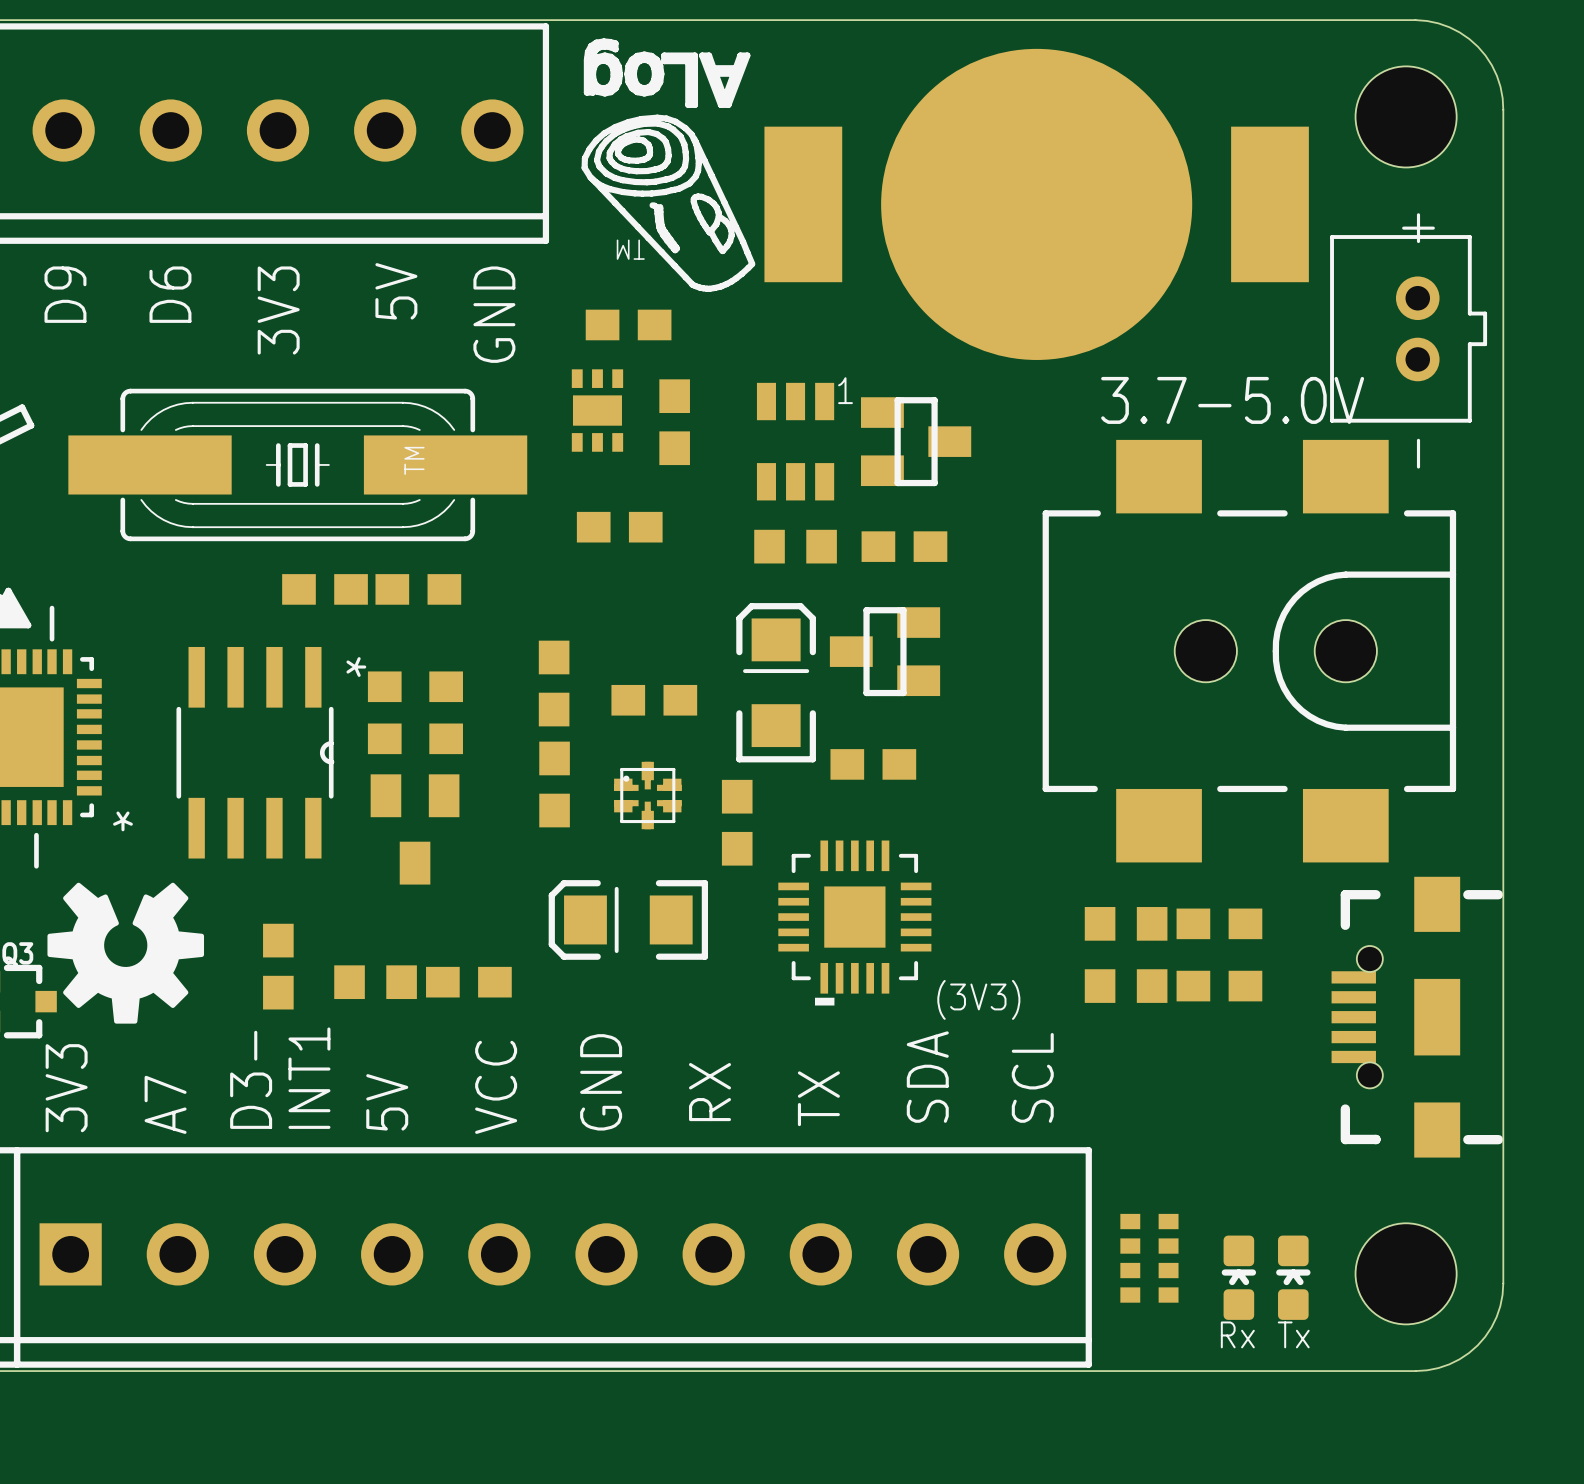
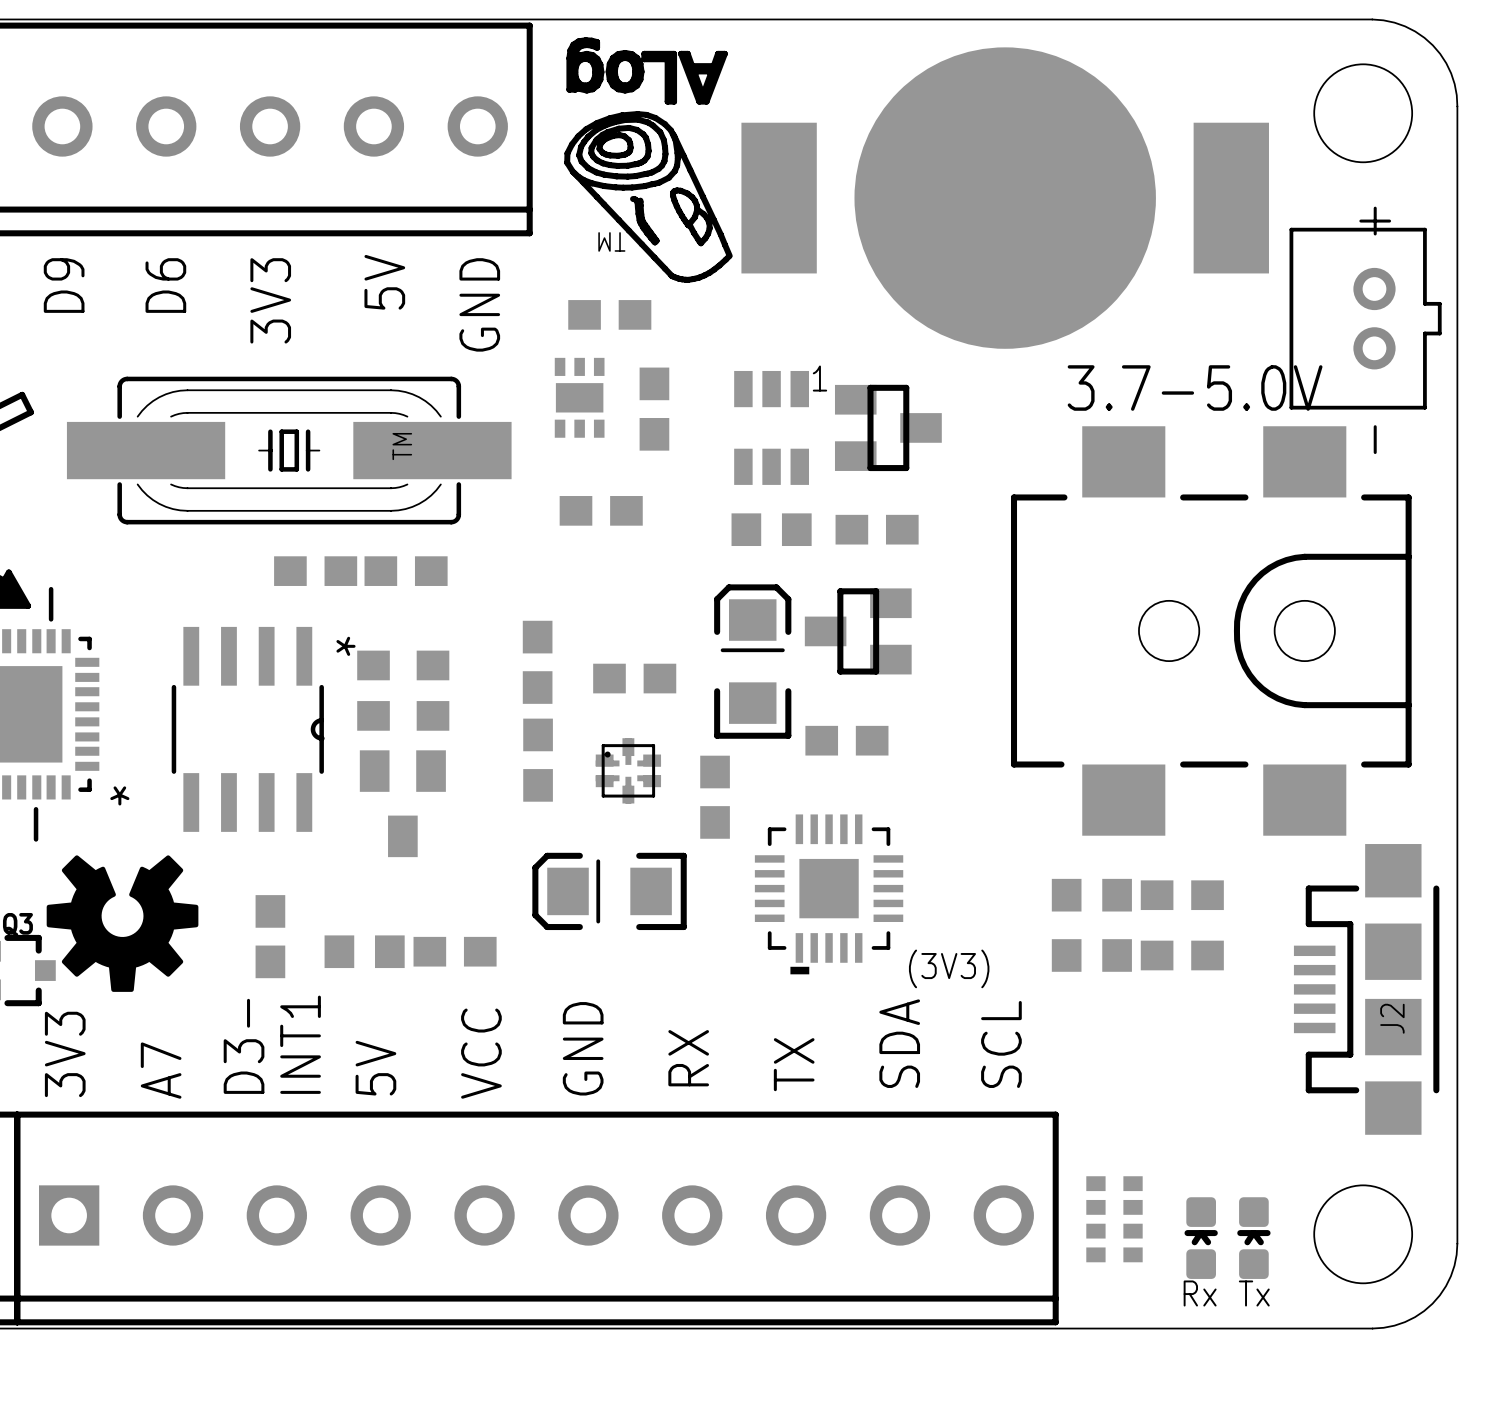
part: (1417, 1017) -> none
J2: none -> (1366, 989)

